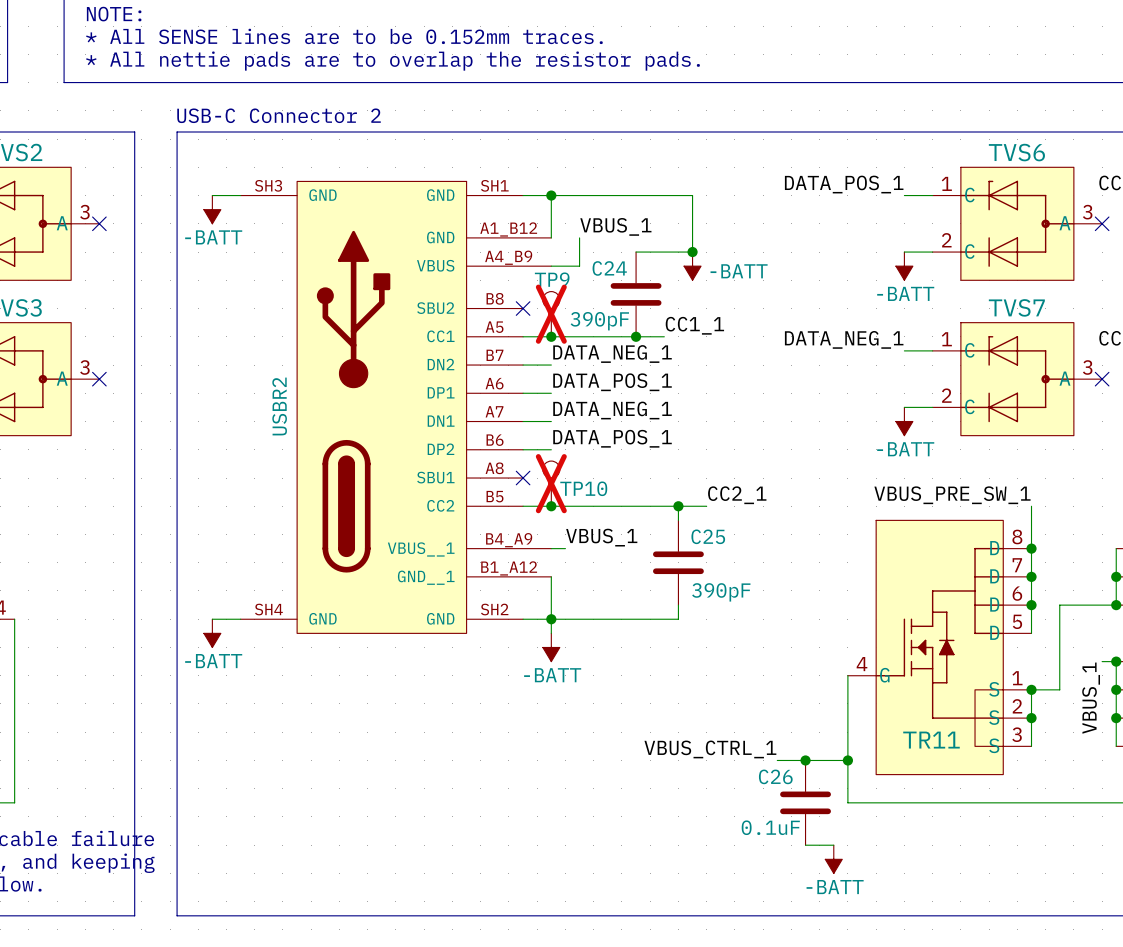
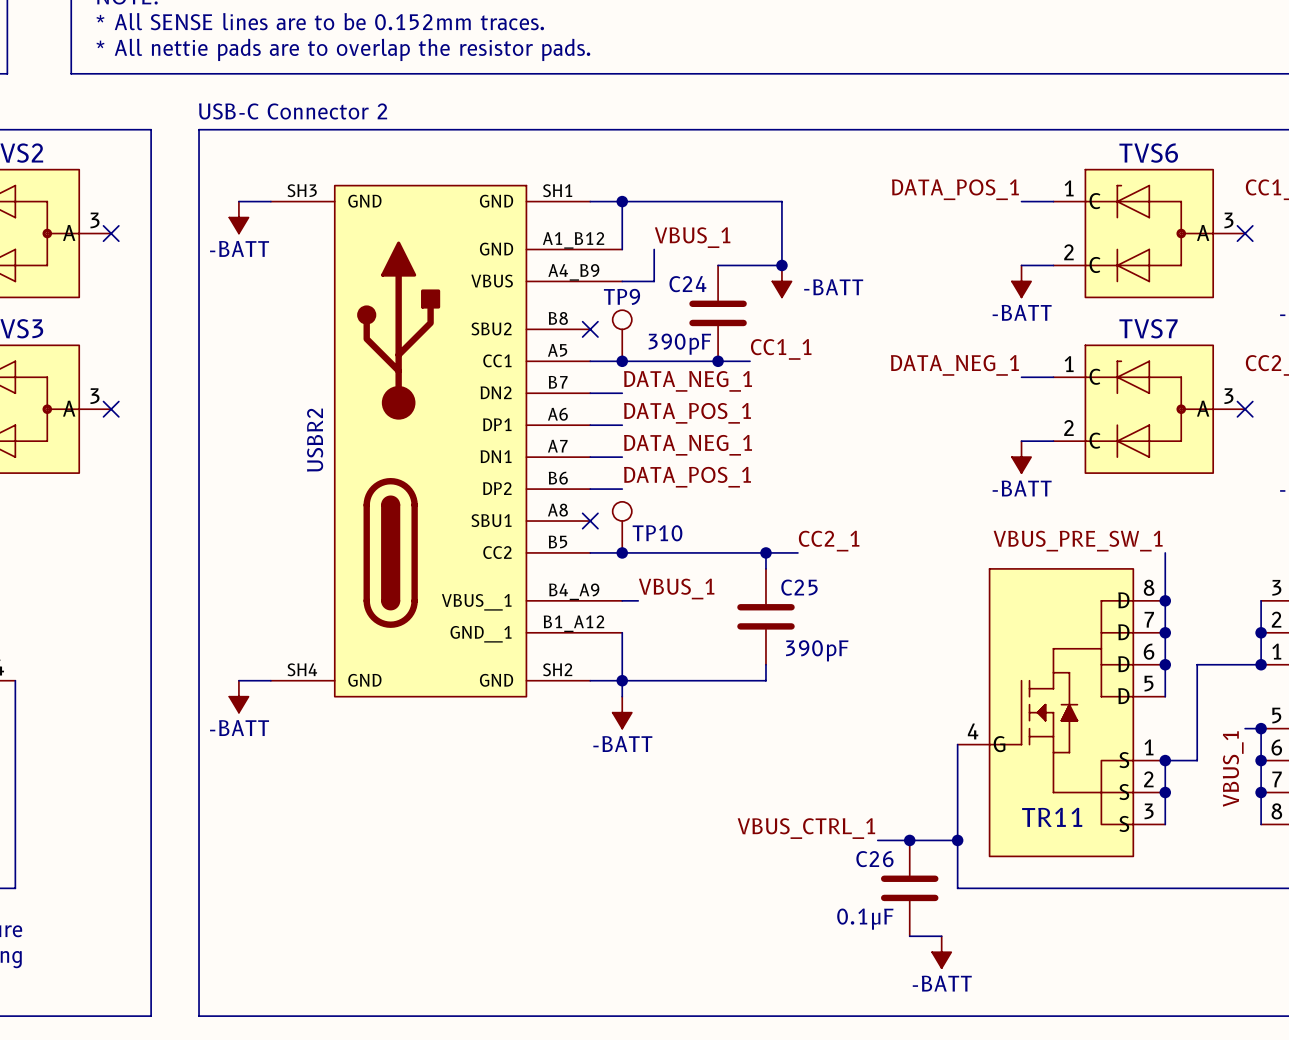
TP9 do-not-place cross: (551, 314) -> none
TP10 do-not-place cross: (551, 483) -> none
C26 value: 0.1uF (770, 827) -> 0.1μF (865, 919)

